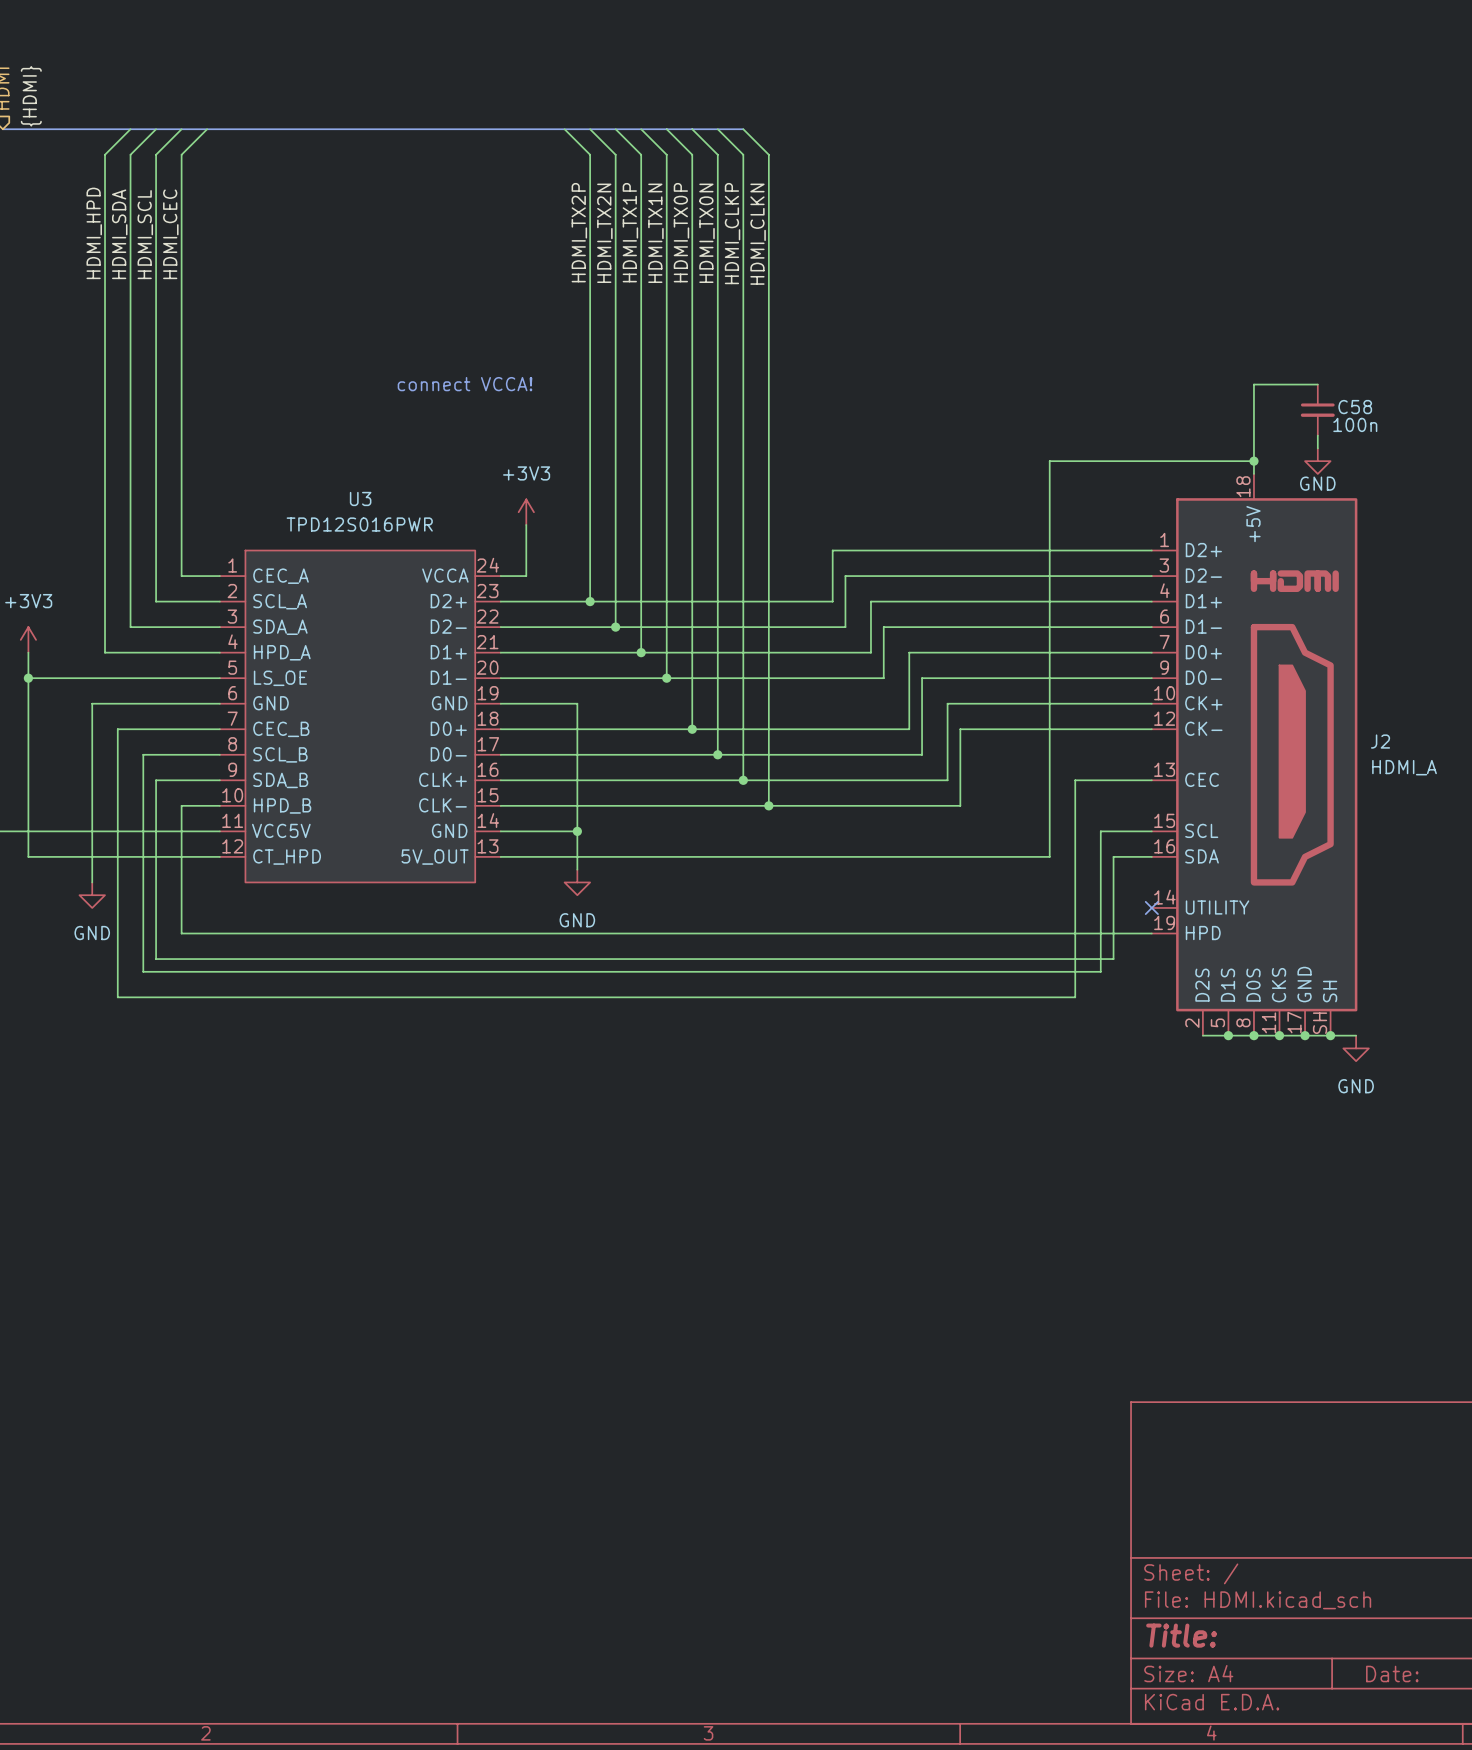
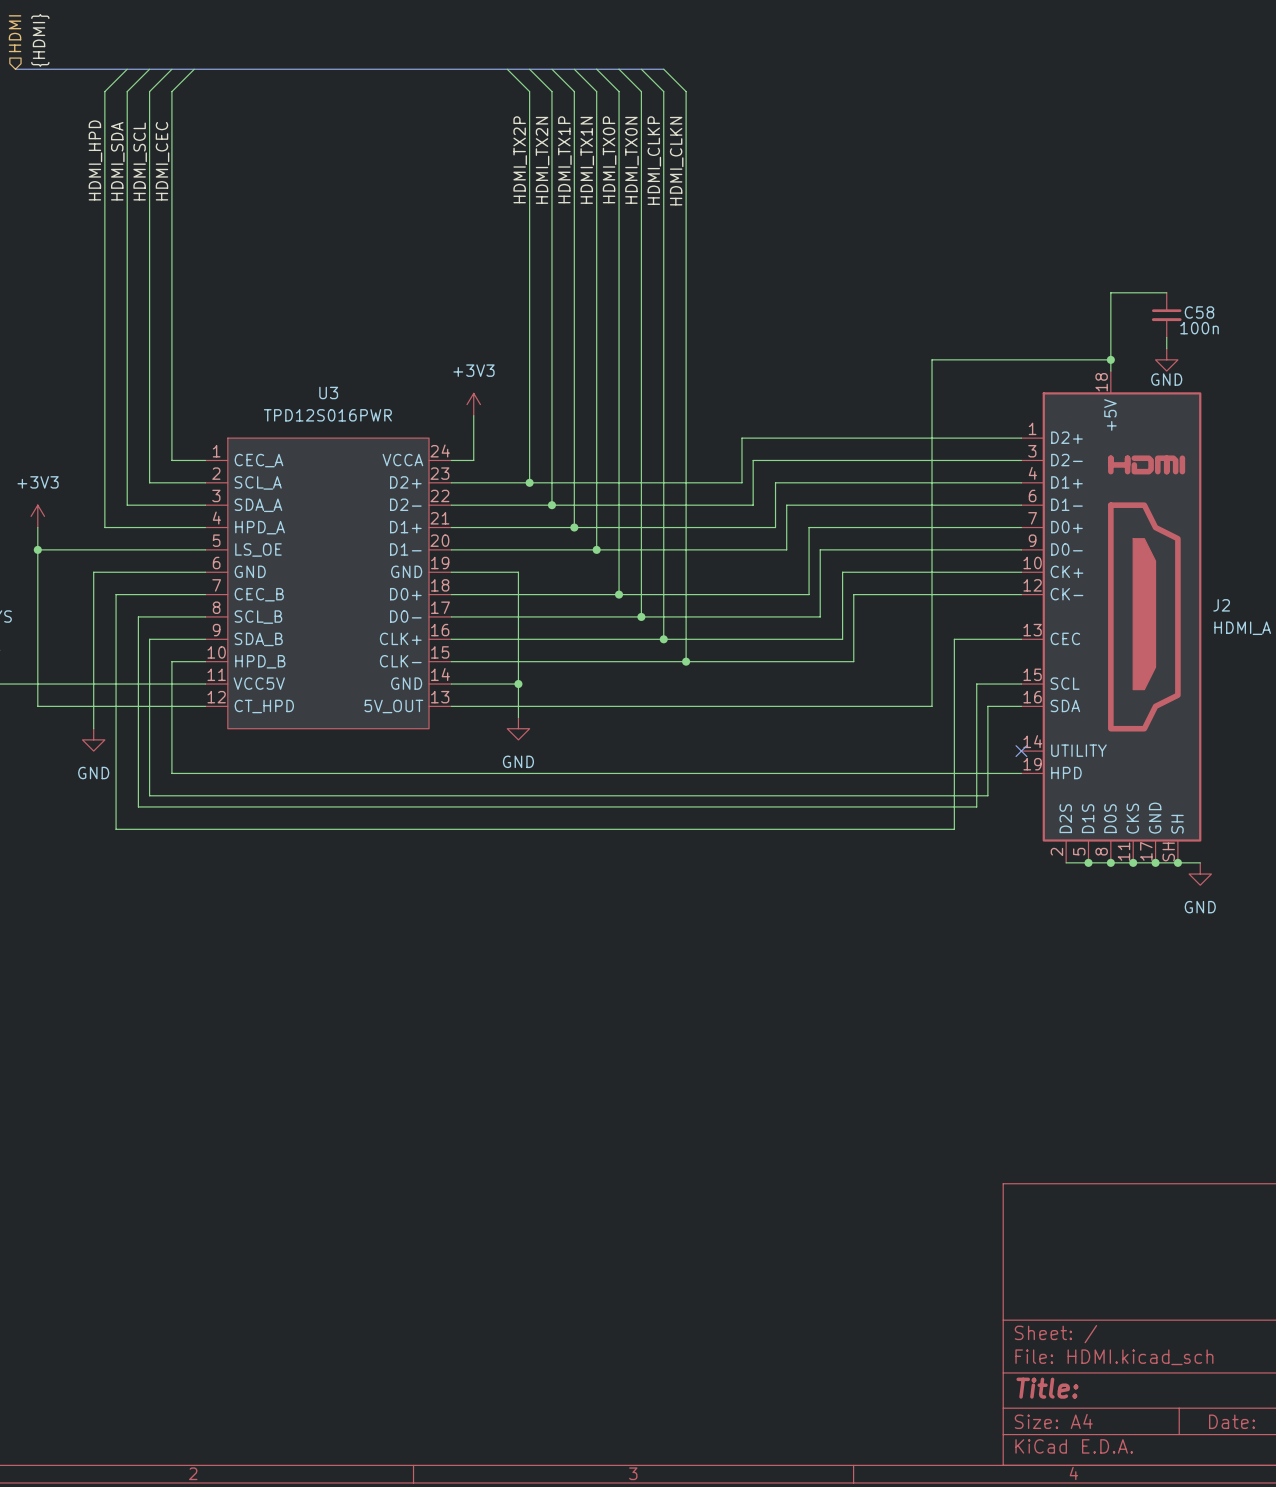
text: connect VCCA! (465, 384) -> none

